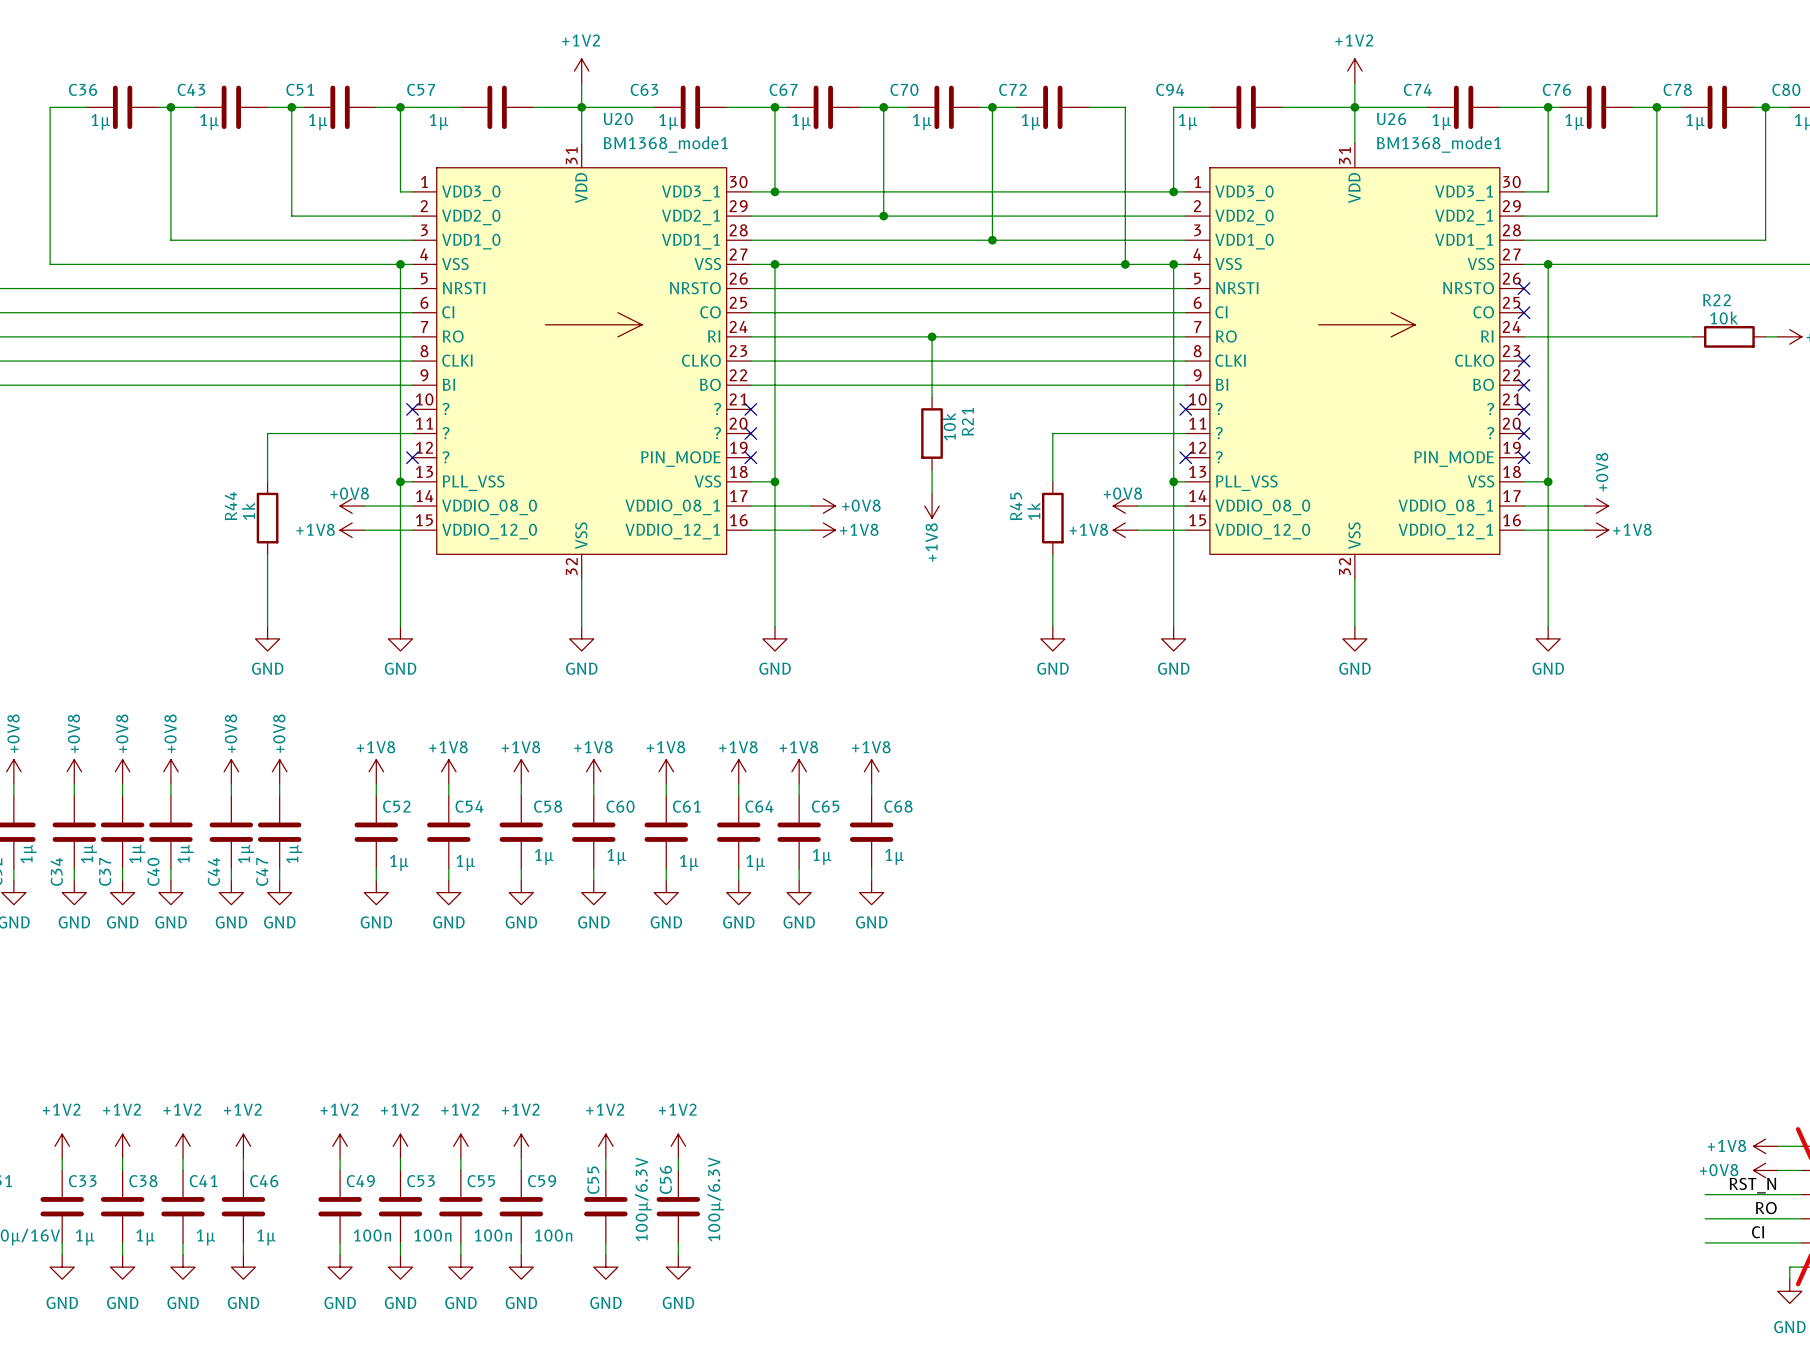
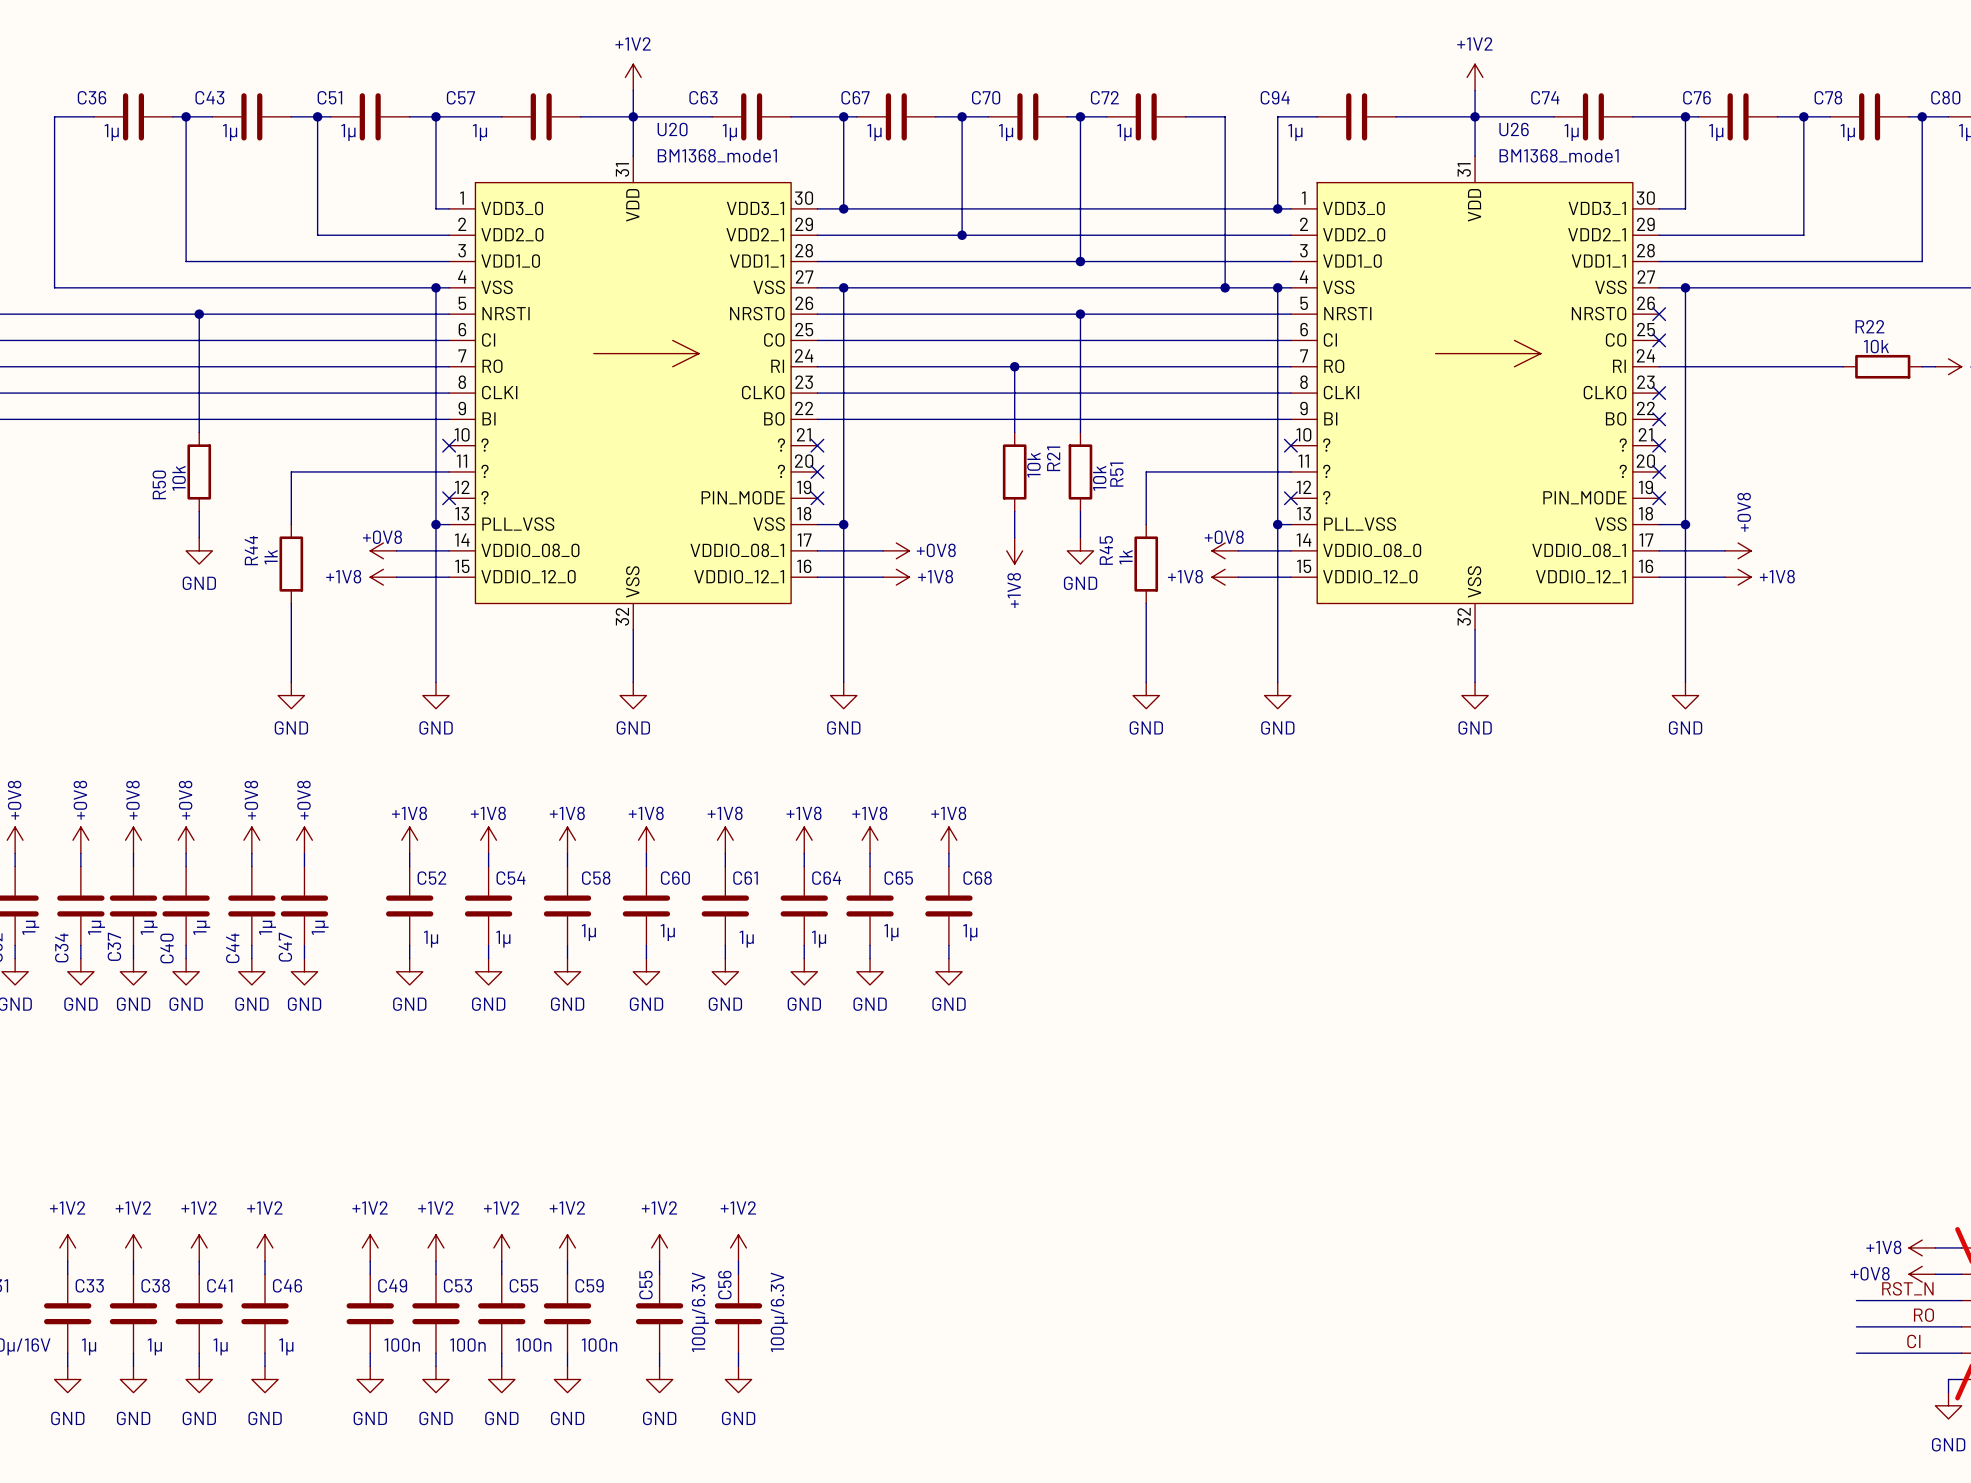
wire: none -> (199, 314) (199, 432)
junction: none -> (199, 314)
wire: none -> (1080, 314) (1080, 432)
junction: none -> (1080, 314)
R50: none -> 10k (199, 471)
R51: none -> 10k (1080, 471)
wire: none -> (199, 511) (199, 537)
wire: none -> (1080, 511) (1080, 537)
power symbol: none -> GND (199, 550)
power symbol: none -> GND (1080, 550)

